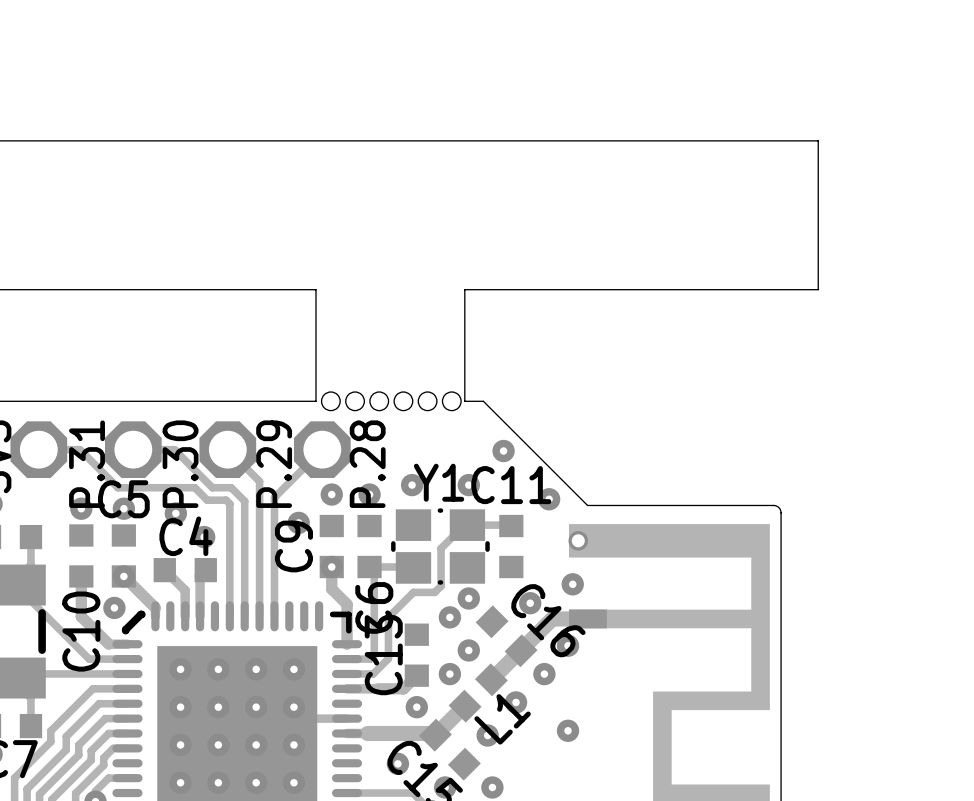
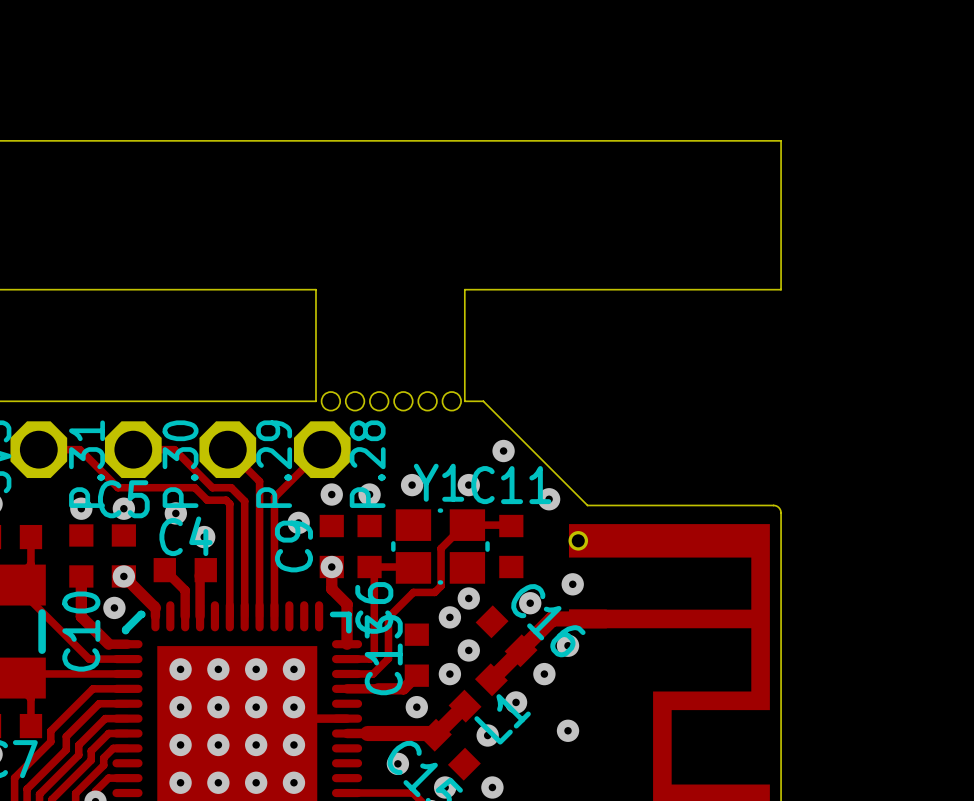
board edge: (781, 140) (818, 140) (818, 289) (781, 289) -> (781, 140) (781, 289)

